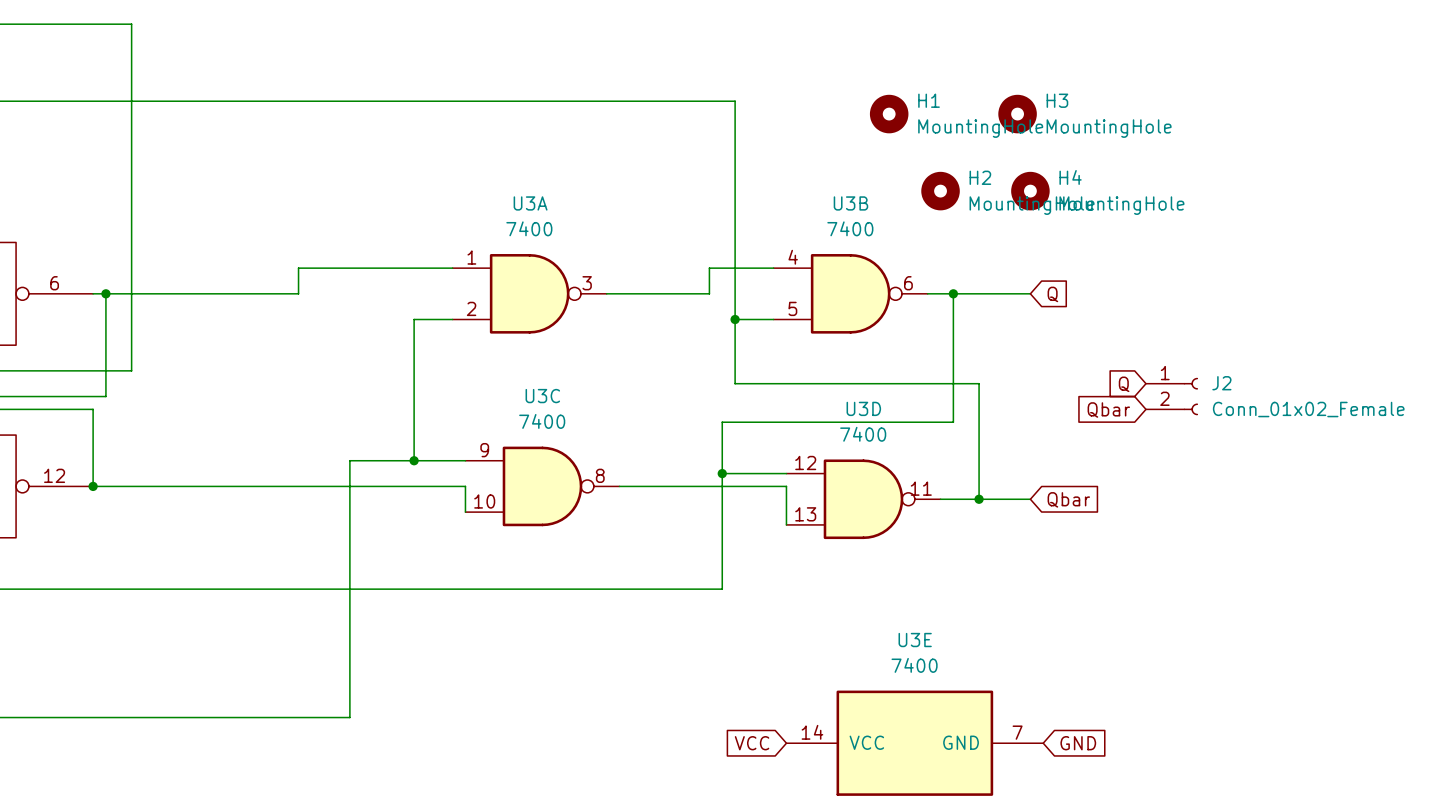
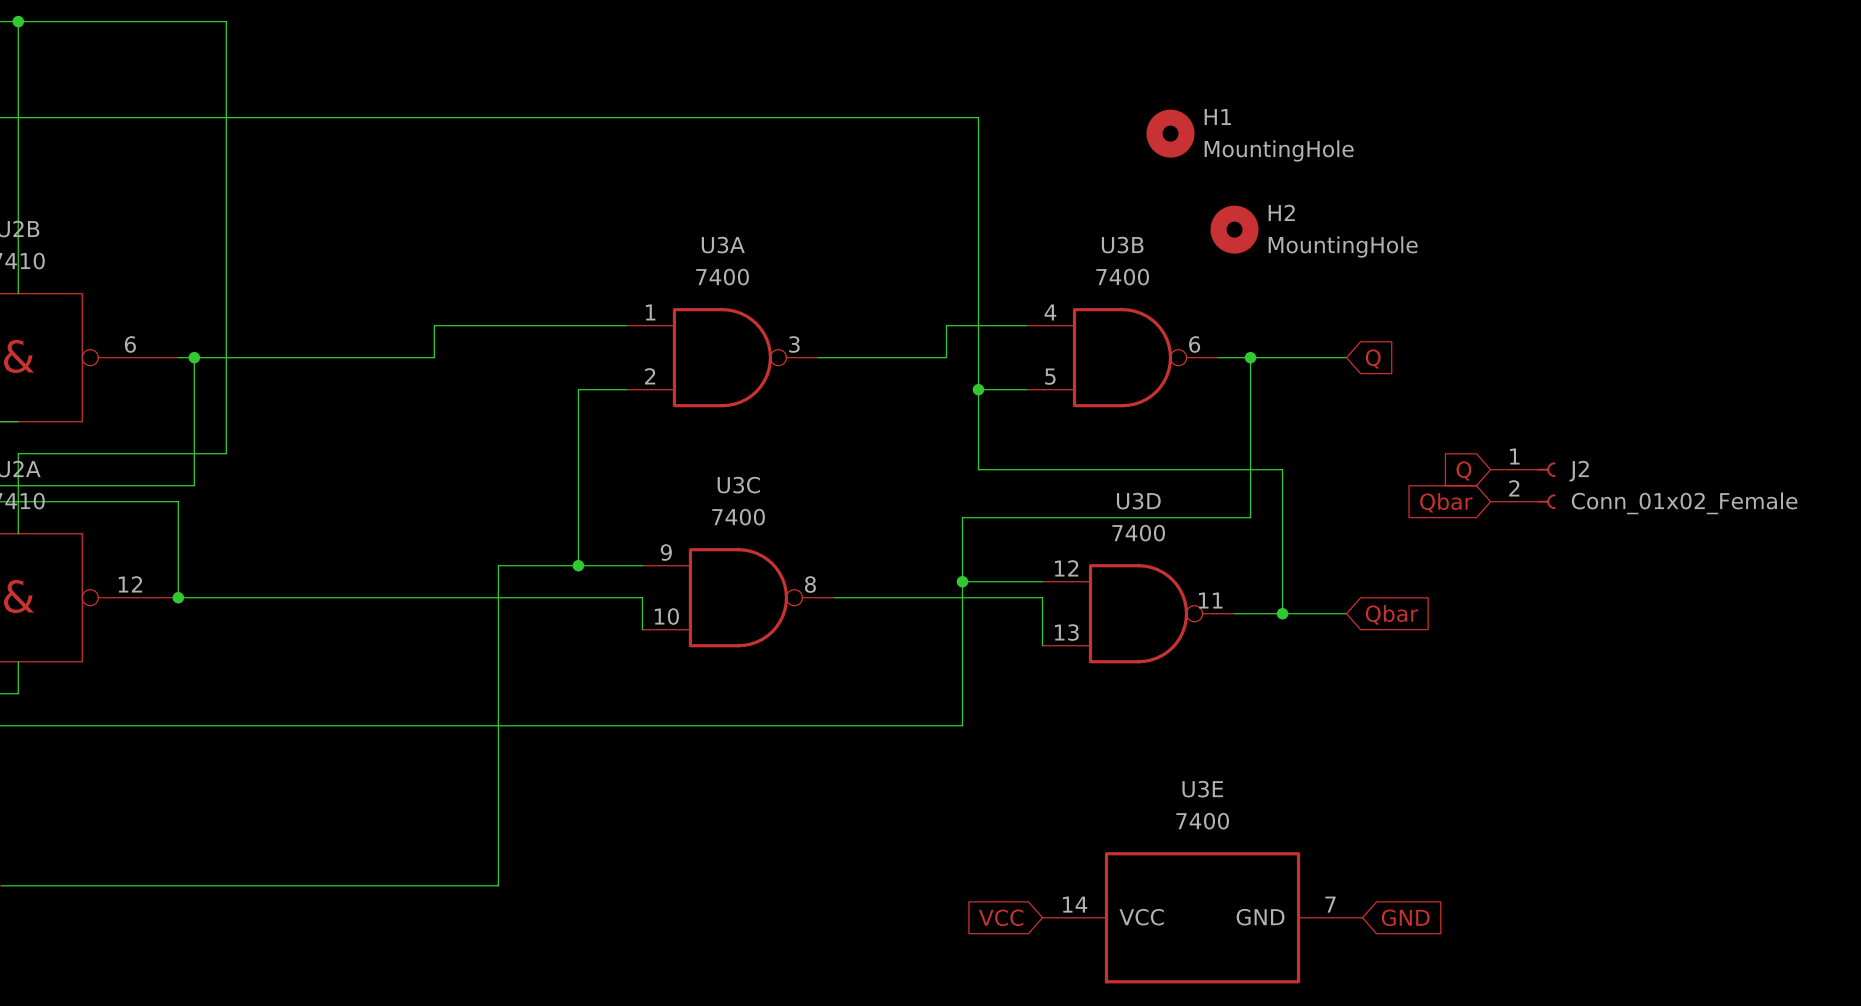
H3: MountingHole (1017, 114) -> none
H4: MountingHole (1030, 191) -> none

